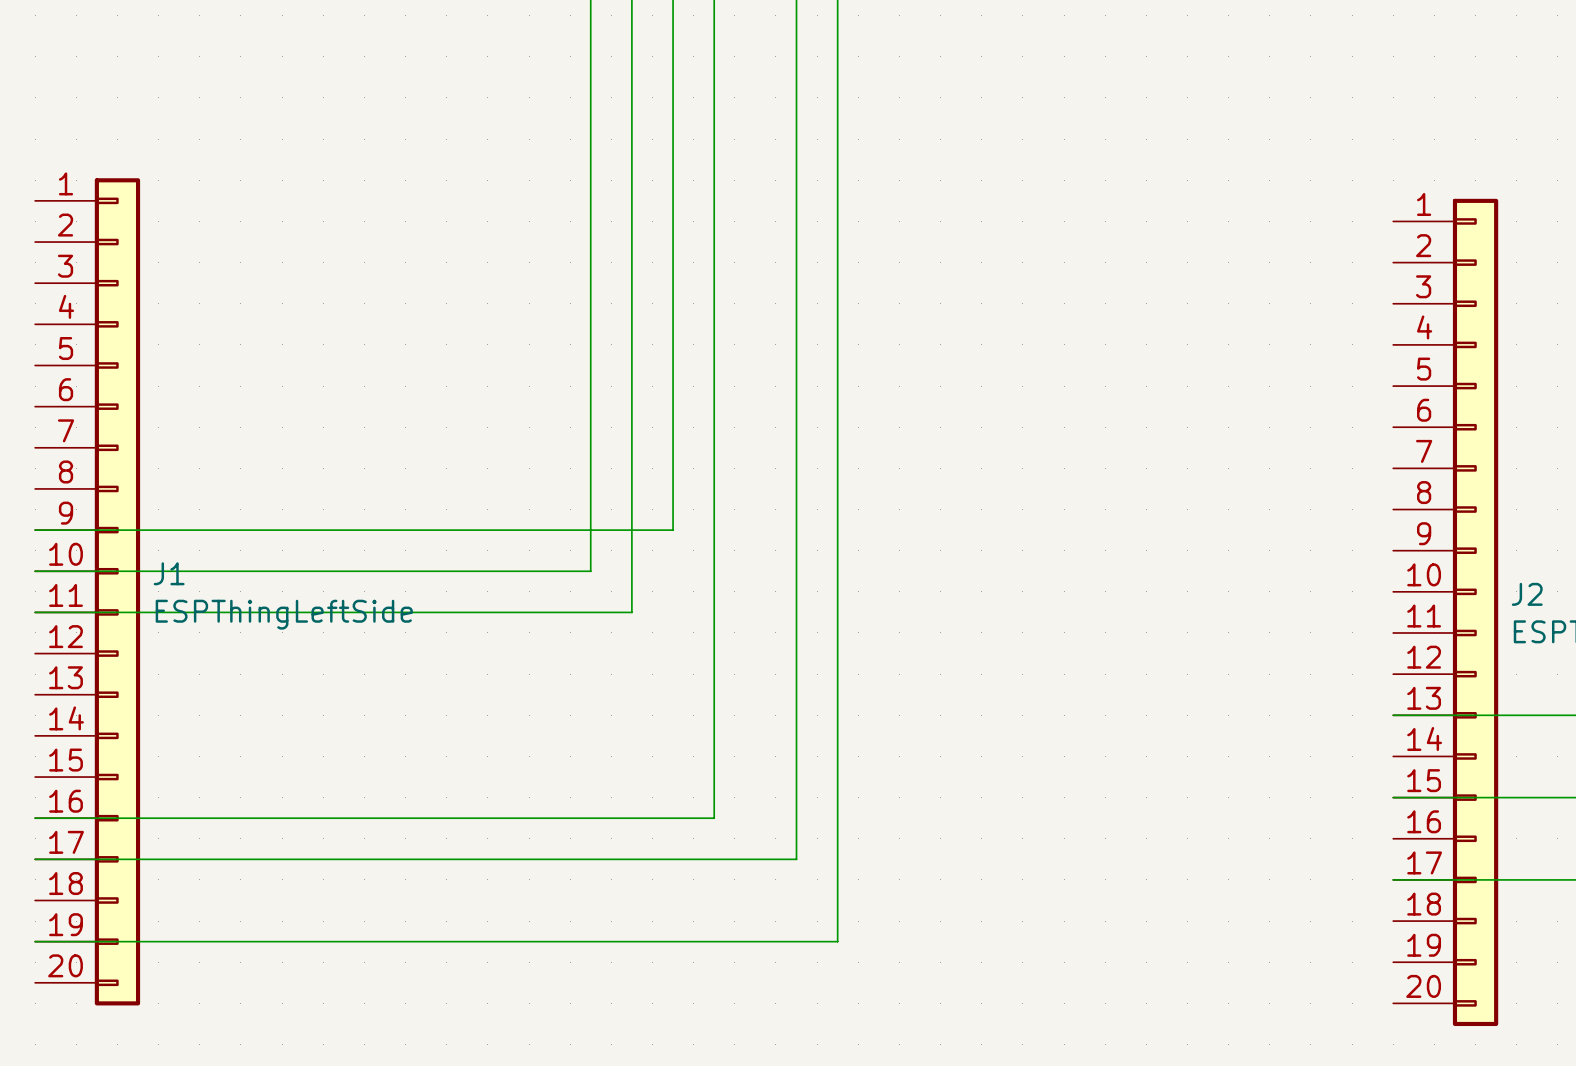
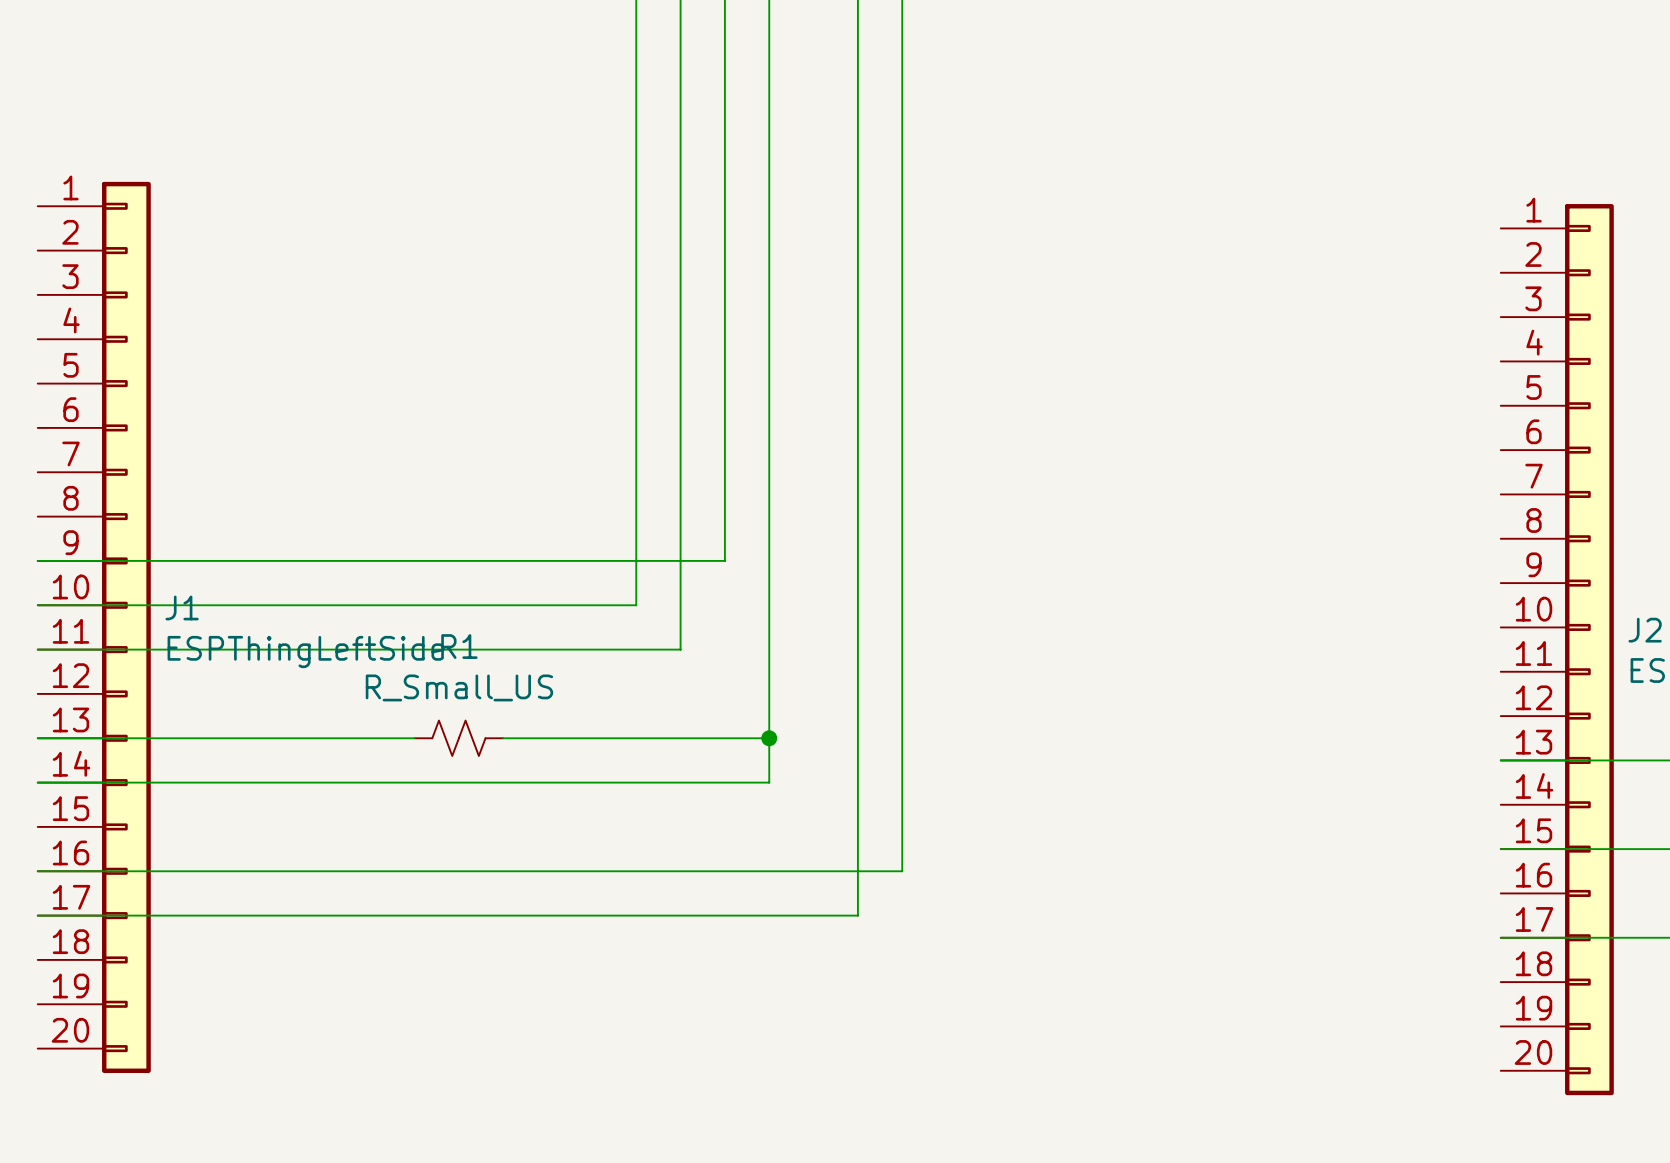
wire: none -> (37, 738) (414, 738)
R1: none -> R_Small_US (458, 738)
wire: none -> (503, 738) (769, 738)
junction: none -> (769, 738)
wire: none -> (37, 782) (769, 782)
wire: (714, 735) (714, 818) -> (902, 871) (769, 871)
wire: (837, 818) (837, 941) (35, 941) -> none

